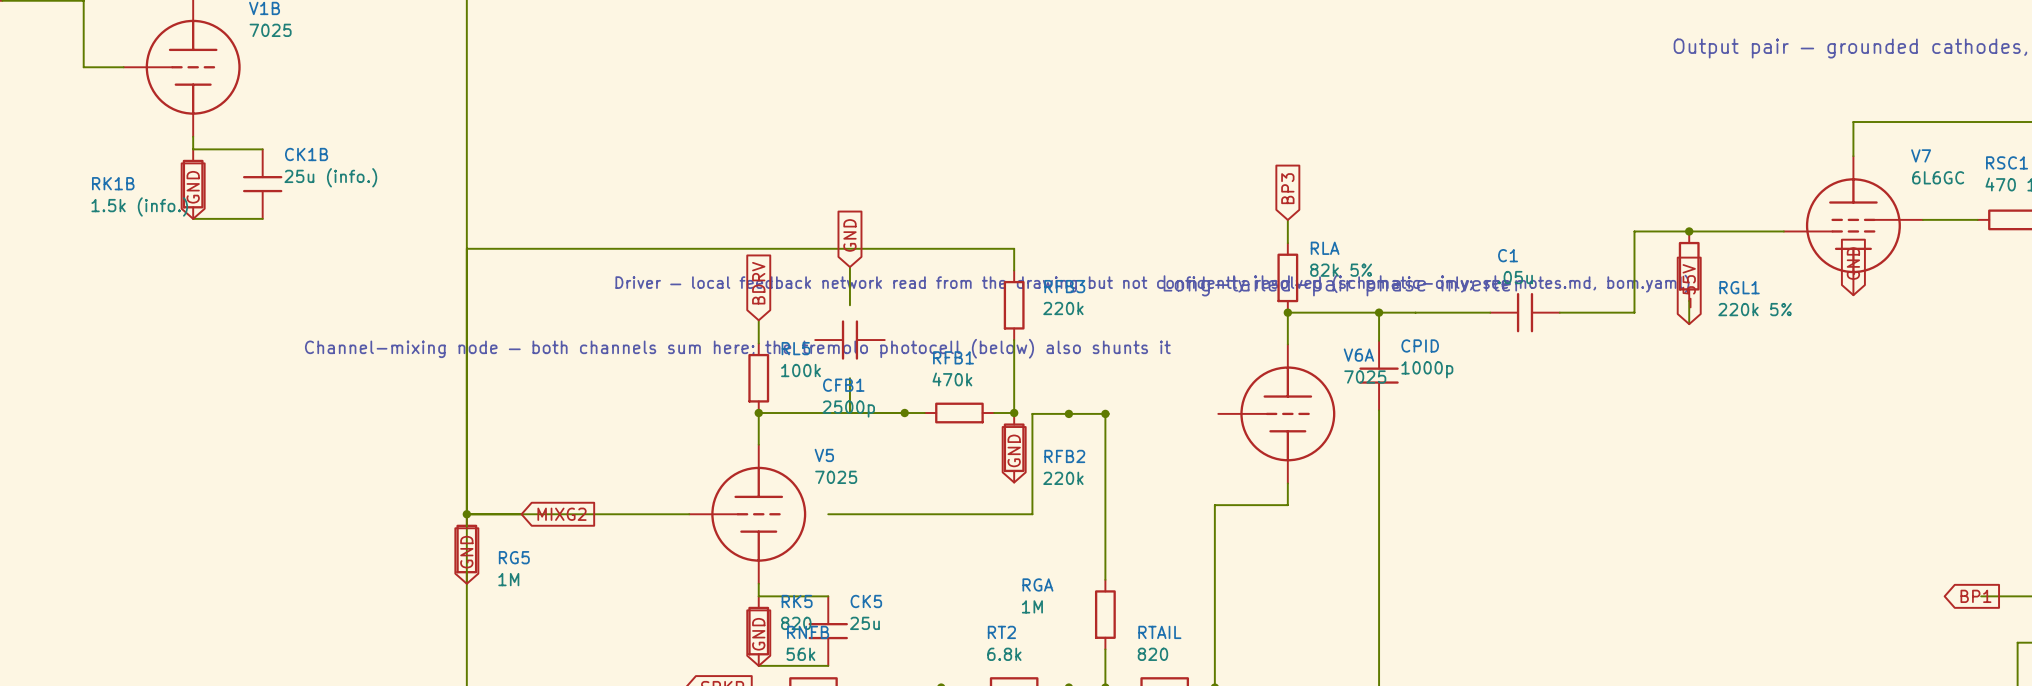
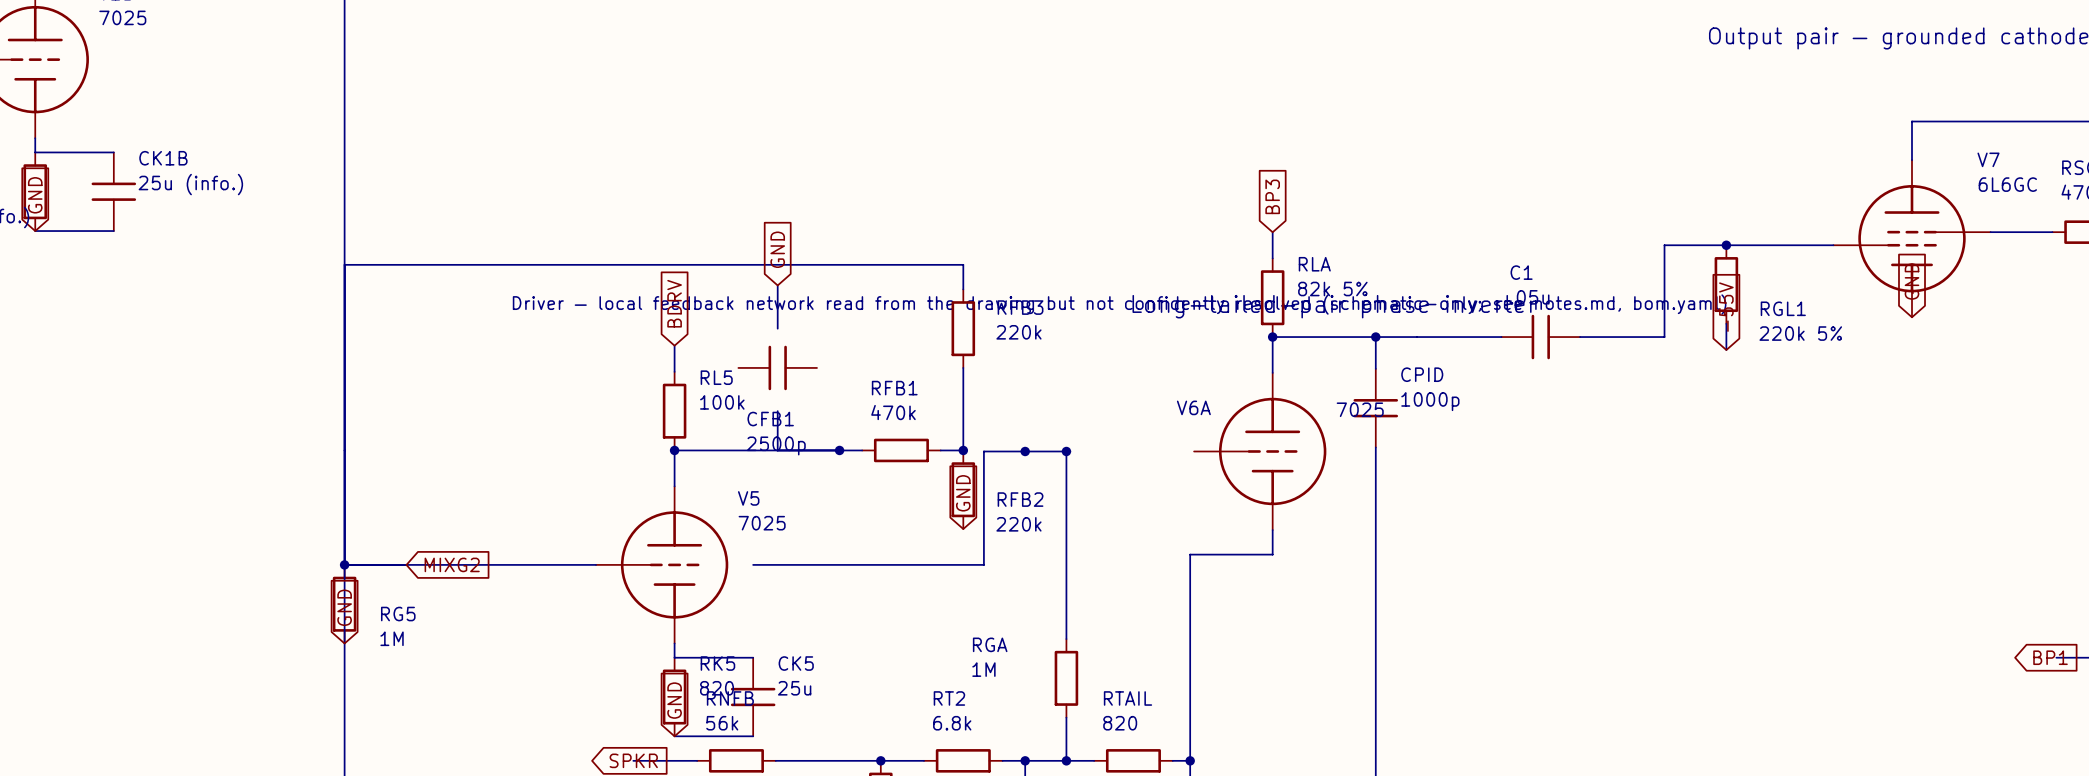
text: Channel-mixing node — both channels sum here; the tremolo photocell (below) also shunts it (737, 348) -> none
V6A name position: V6A (1358, 355) -> V6A (1193, 407)

